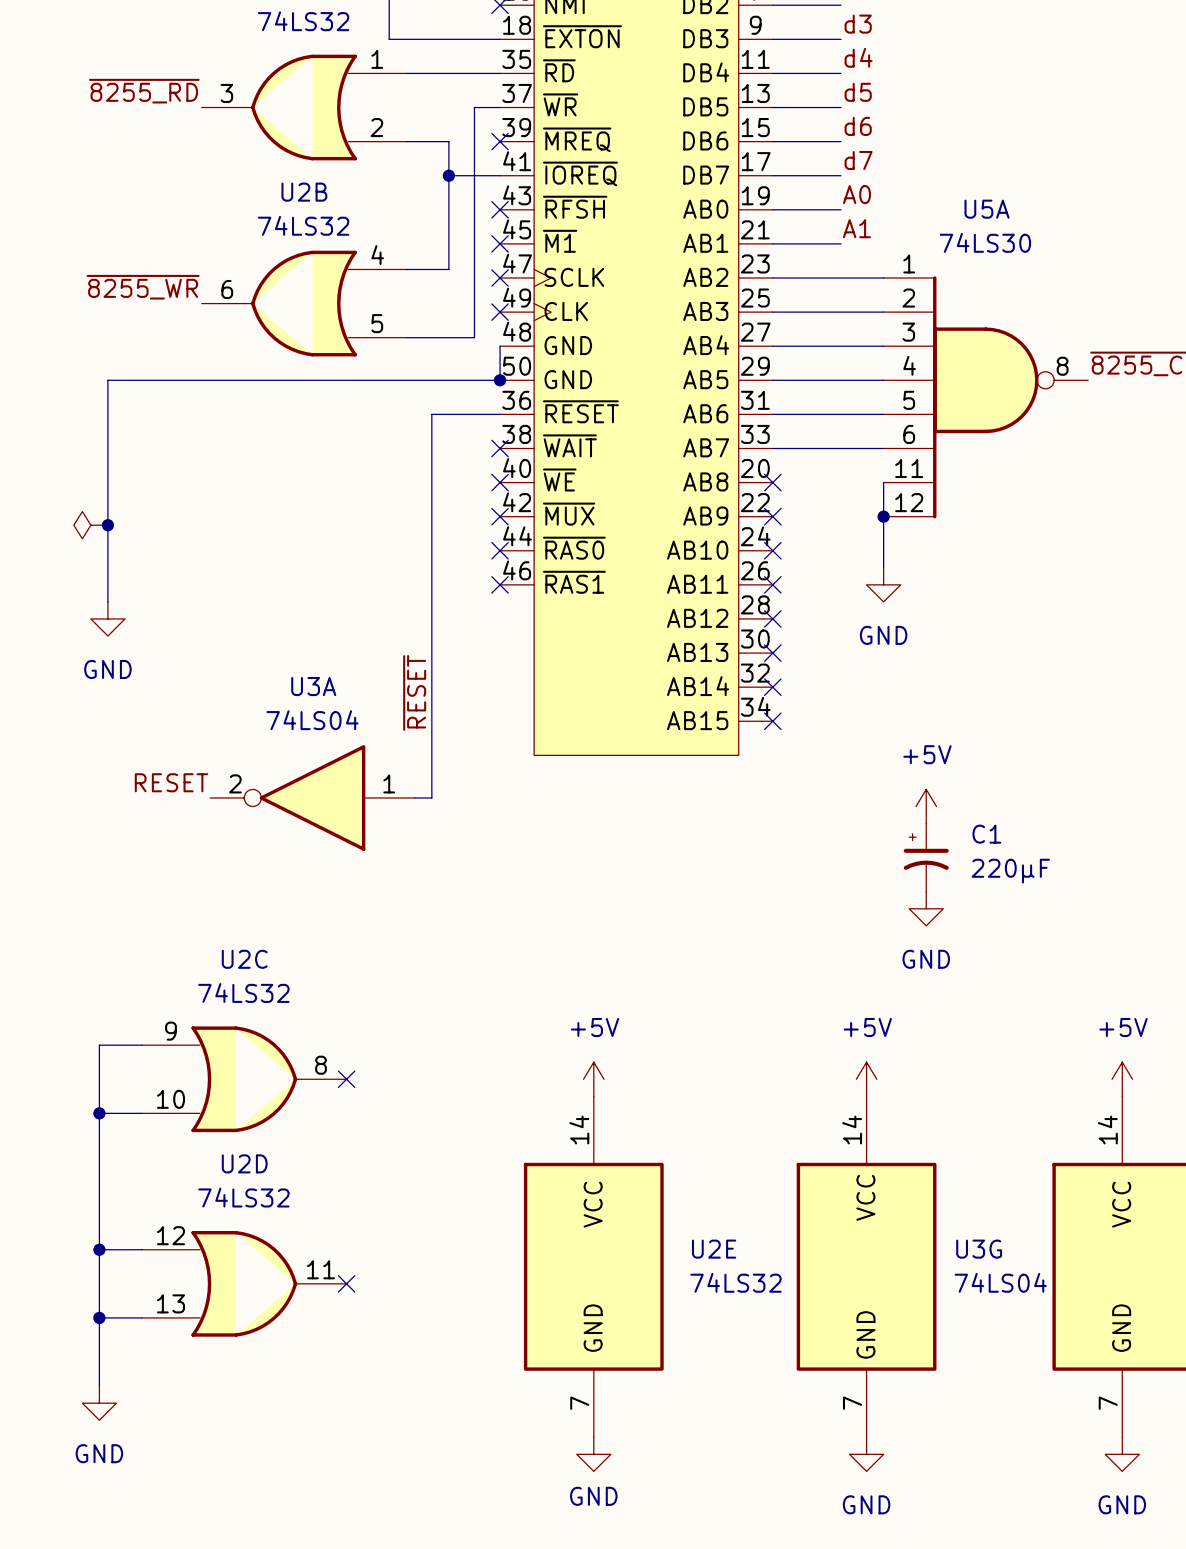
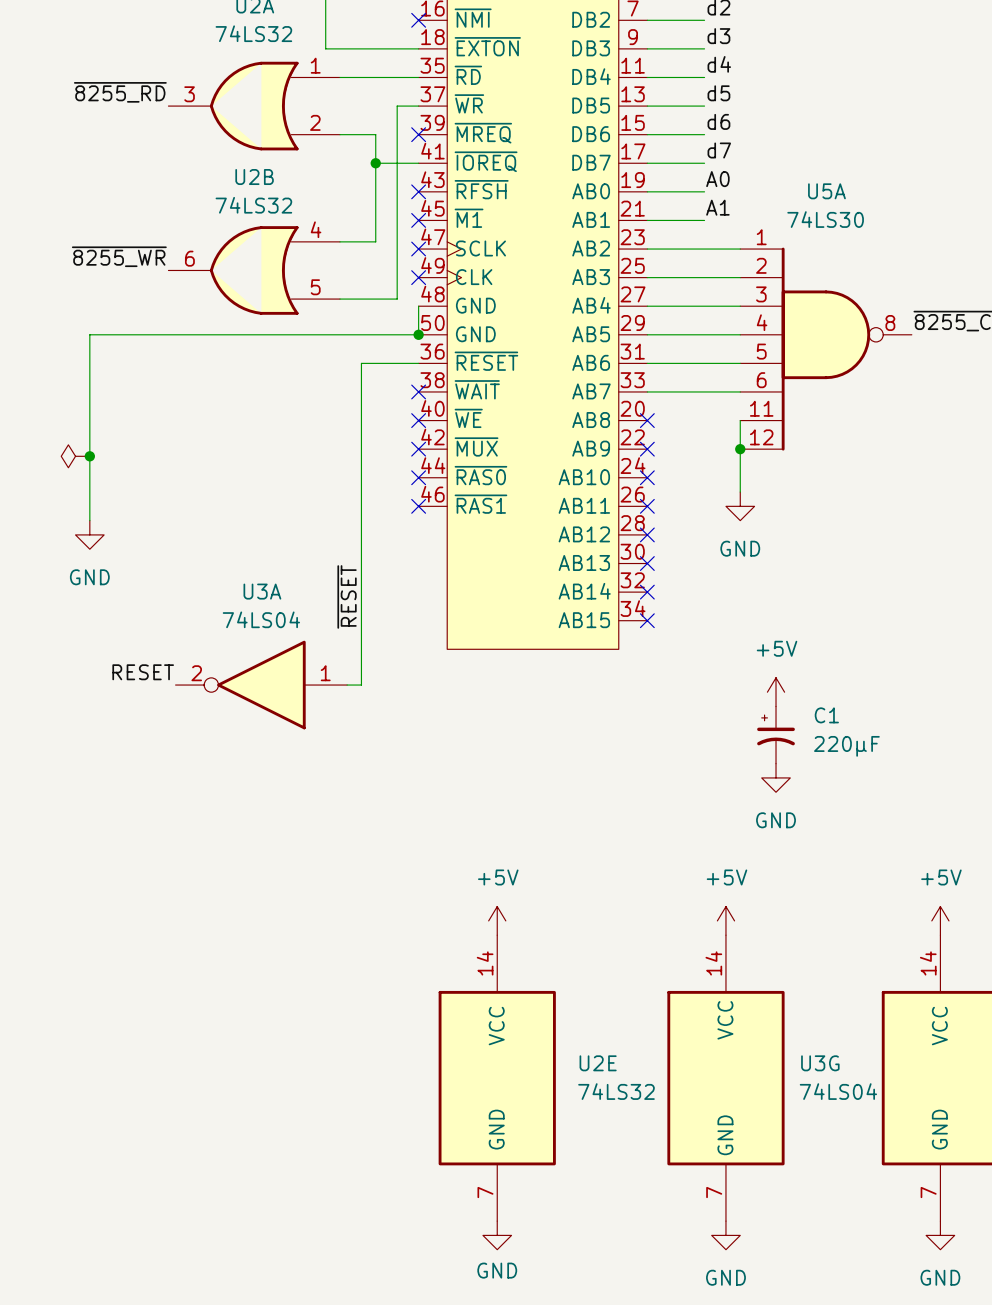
wire: (142, 1045) (99, 1045) (99, 1386) -> none
U2C: 74LS32 (244, 1079) -> none
no-connect mark: (346, 1079) -> none
wire: (99, 1113) (142, 1113) -> none
junction: (99, 1113) -> none
wire: (99, 1249) (142, 1249) -> none
junction: (99, 1249) -> none
U2D: 74LS32 (244, 1283) -> none
no-connect mark: (346, 1283) -> none
wire: (99, 1317) (142, 1317) -> none
junction: (99, 1317) -> none
power symbol: GND (99, 1403) -> none

